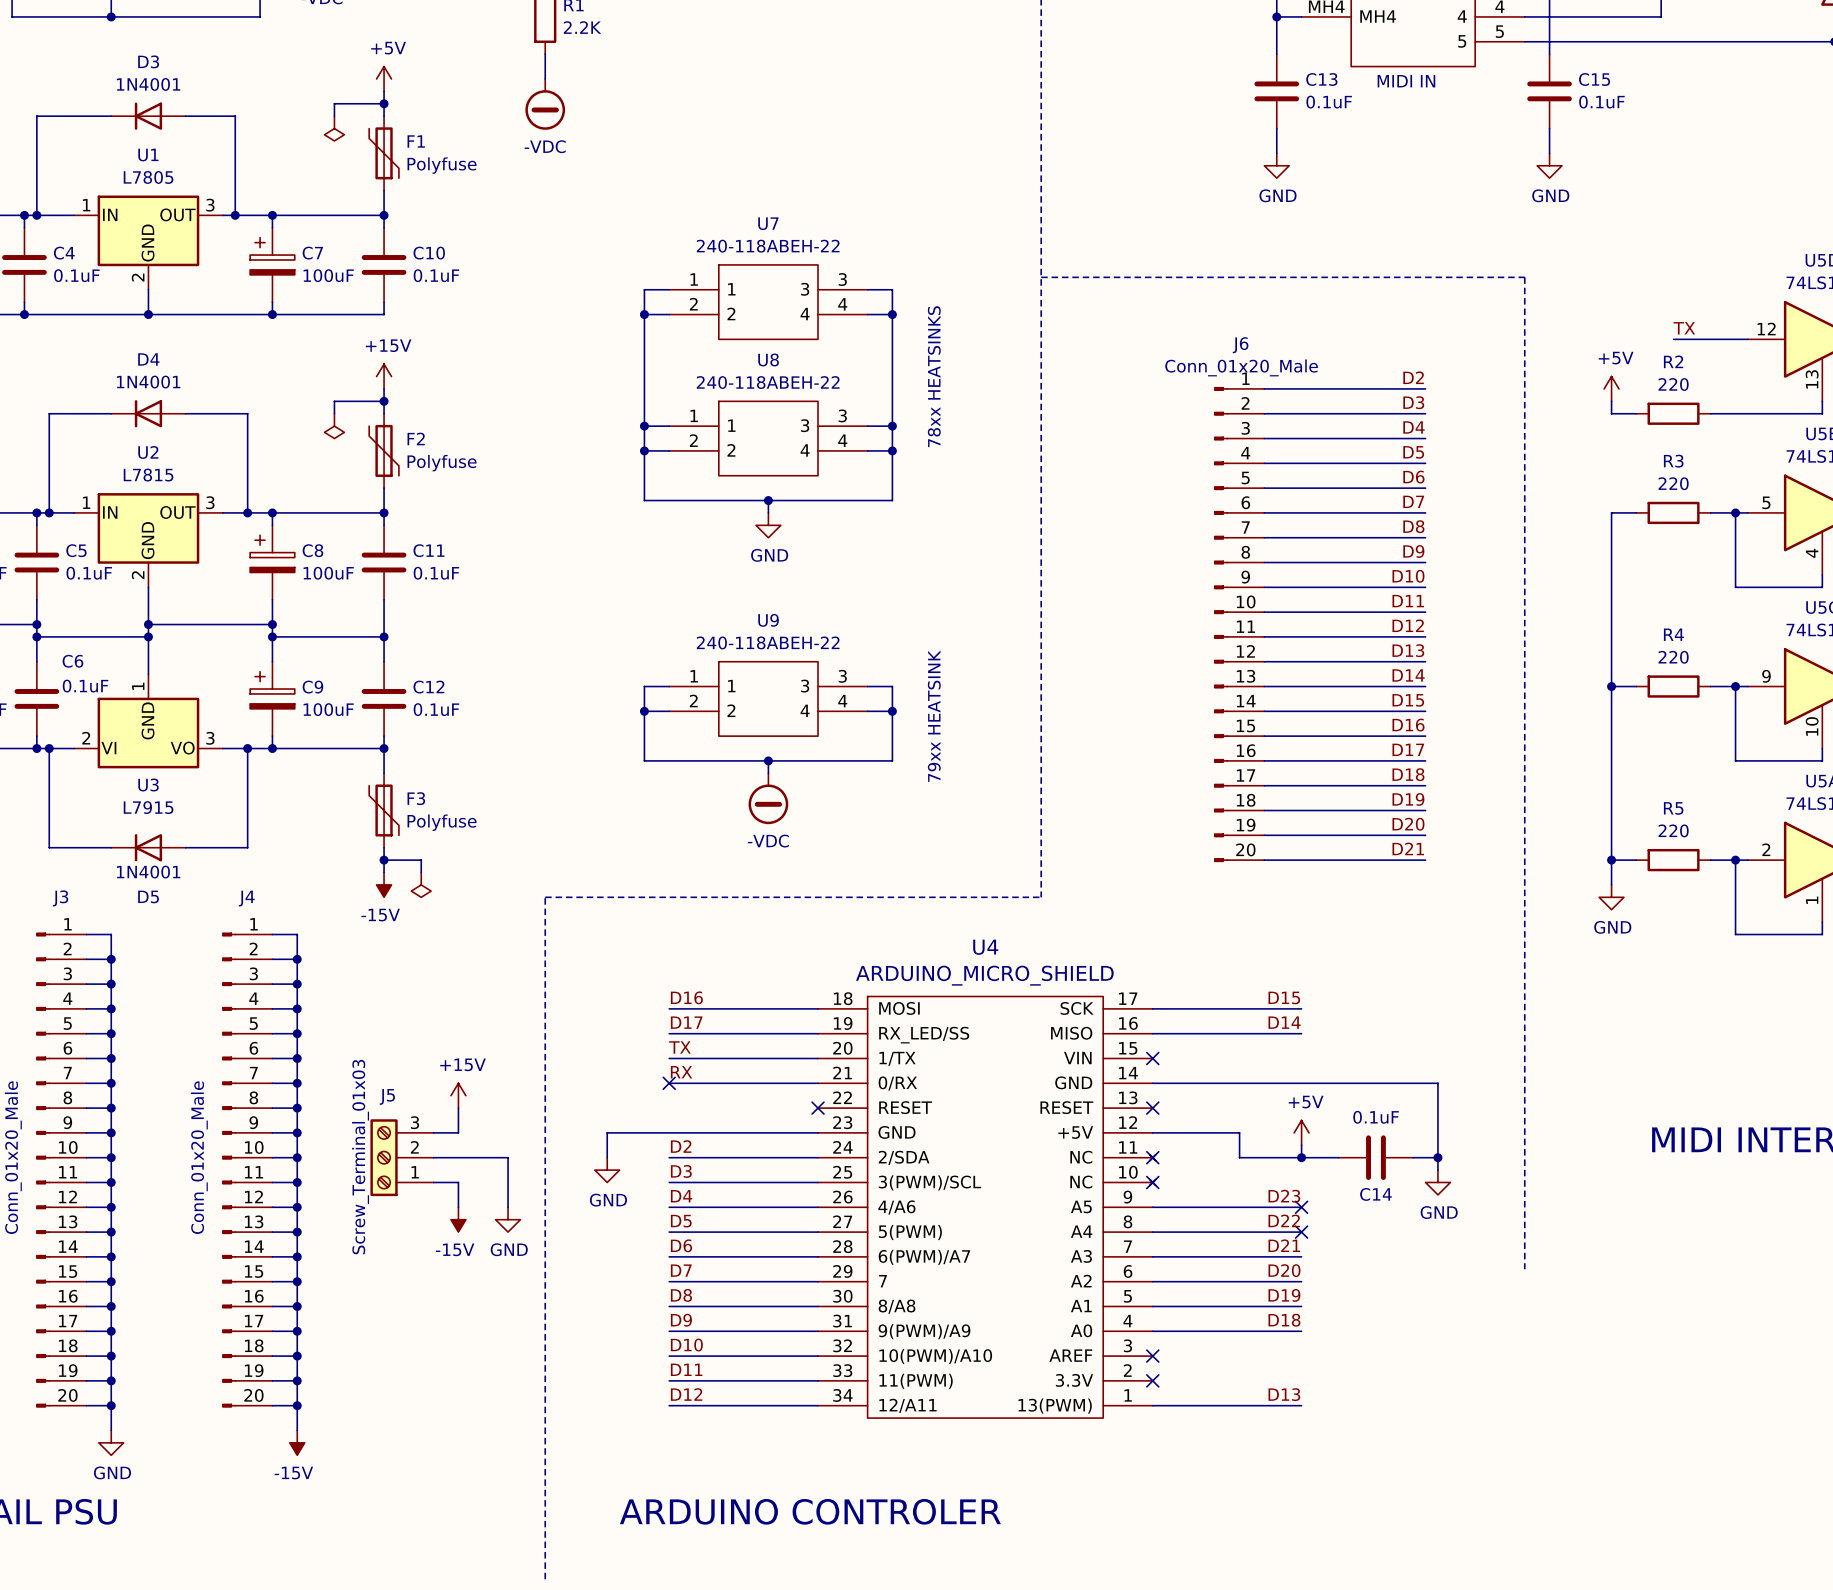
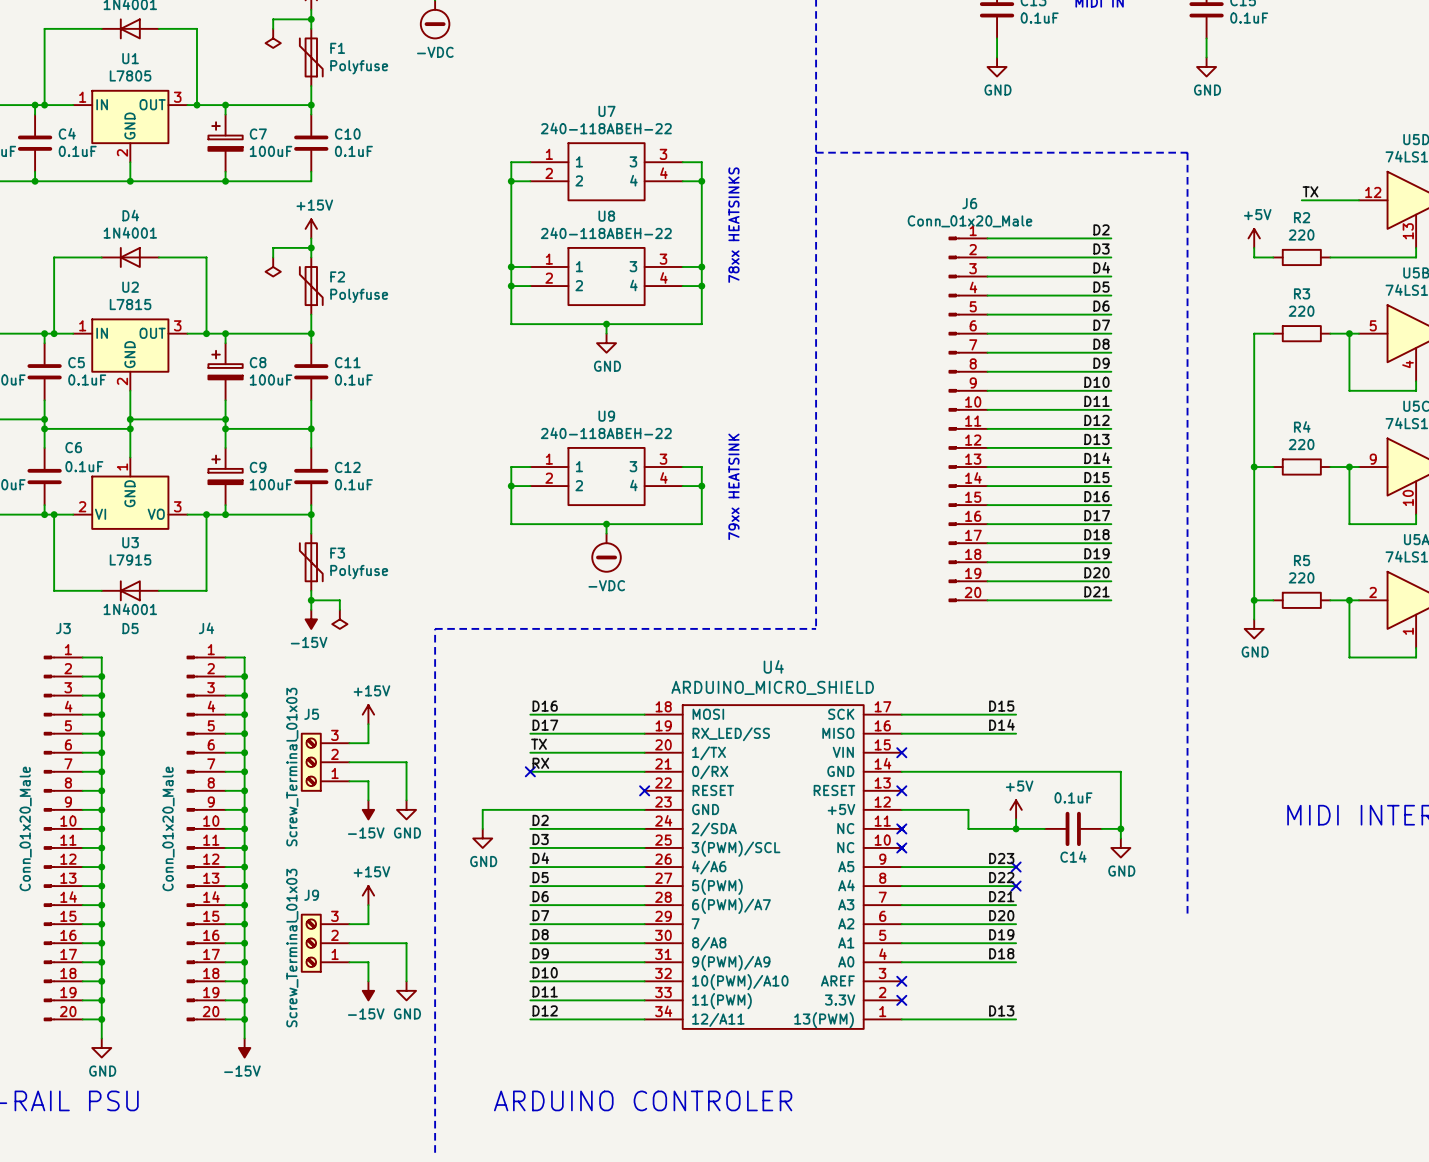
power symbol: none -> +15V (368, 714)
wire: none -> (368, 724) (368, 743) (349, 743)
wire: none -> (349, 762) (406, 762) (406, 800)
wire: none -> (349, 781) (368, 781) (368, 790)
power symbol: +15V (458, 1095) -> none
wire: (458, 1120) (458, 1132) (433, 1132) -> none
power symbol: none -> -15V (368, 809)
power symbol: none -> GND (406, 809)
J5 position: (402, 1157) -> (325, 762)
wire: (433, 1157) (508, 1157) (508, 1207) -> (349, 943) (406, 943) (406, 981)
wire: (433, 1182) (458, 1182) (458, 1207) -> (349, 962) (368, 962) (368, 981)
power symbol: -15V (458, 1219) -> none
power symbol: GND (508, 1219) -> none
power symbol: none -> +15V (368, 895)
wire: none -> (368, 905) (368, 924) (349, 924)
J9: none -> Screw_Terminal_01x03 (325, 943)
power symbol: none -> -15V (368, 990)
power symbol: none -> GND (406, 990)

